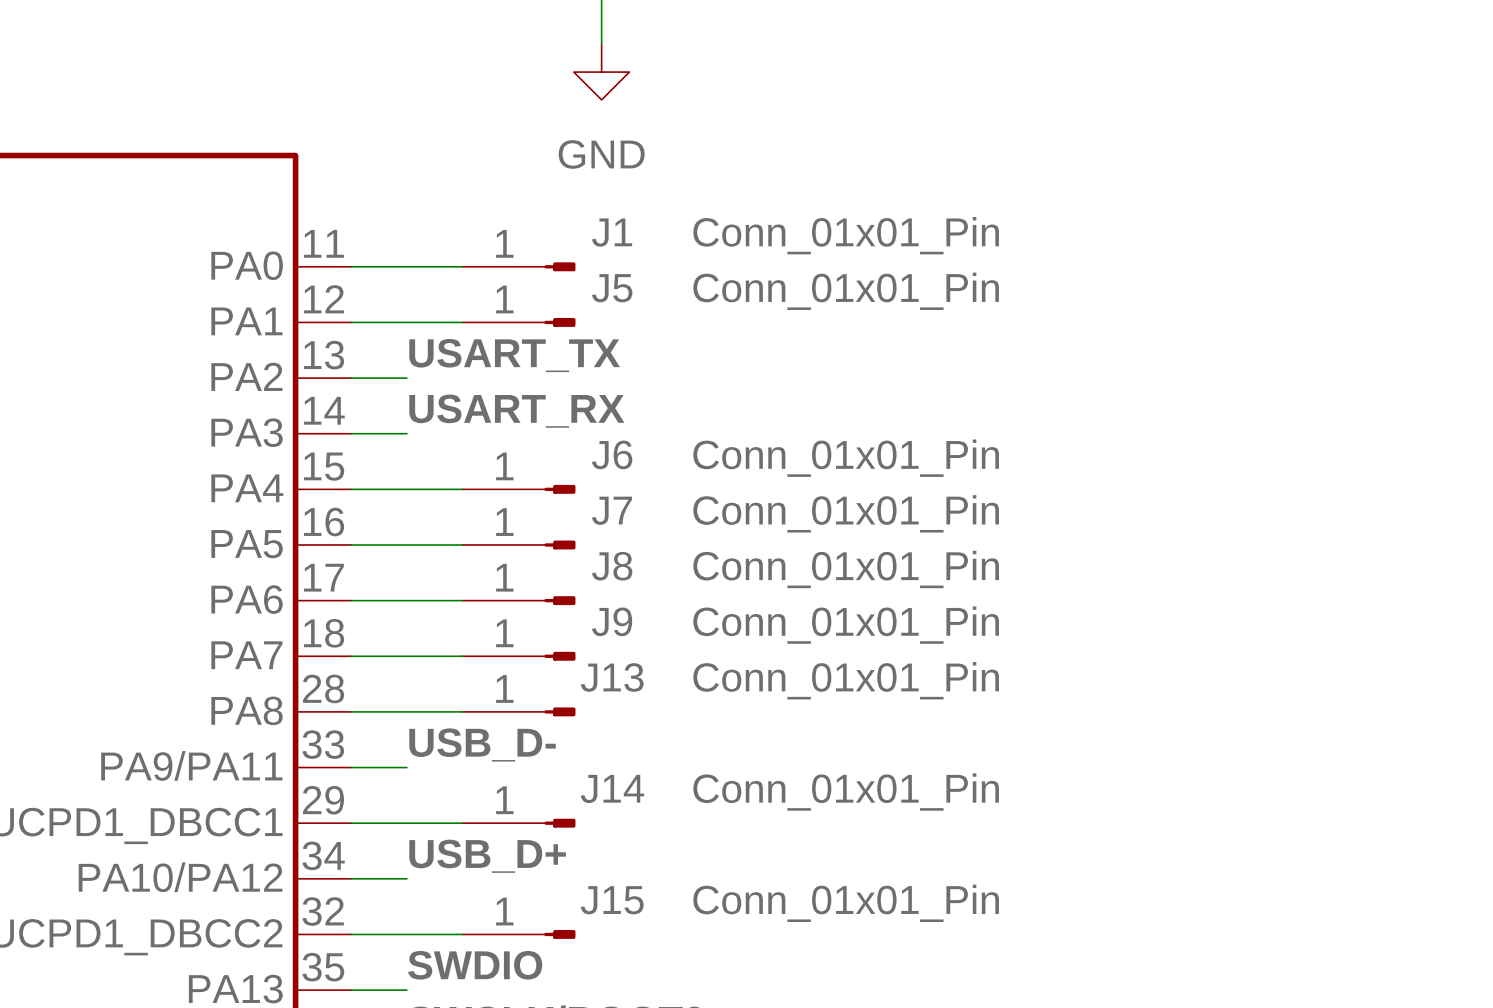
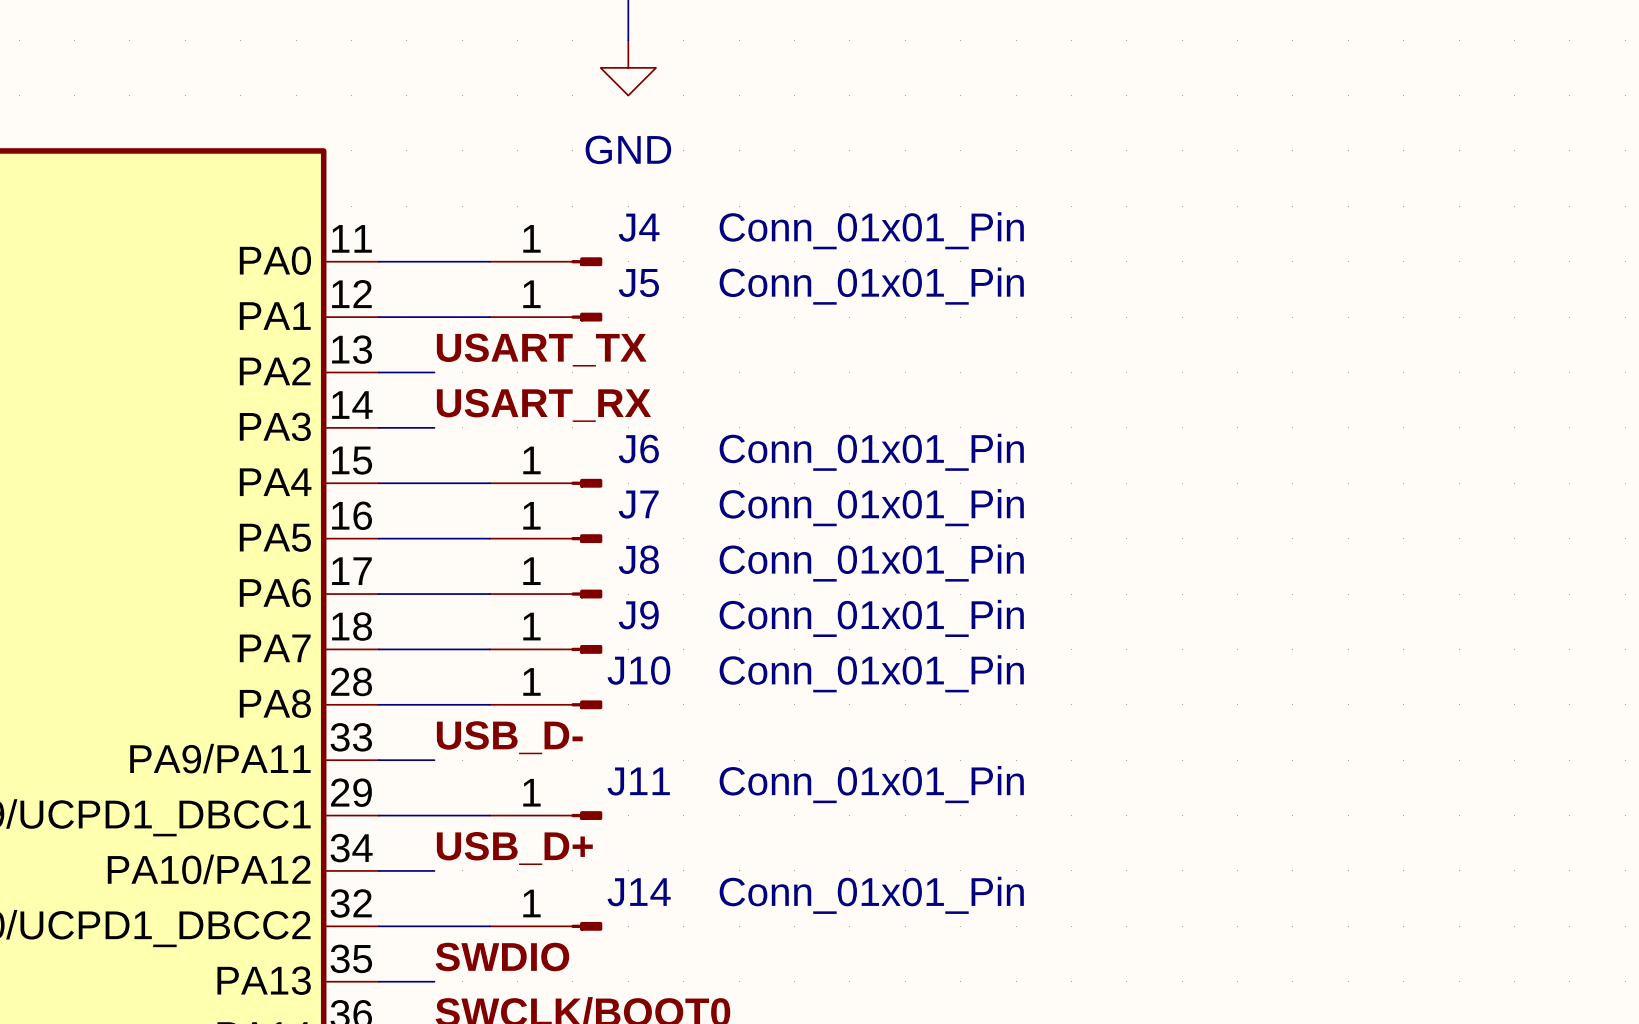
J1 name: J1 (612, 232) -> J4 (639, 227)
J13 name: J13 (612, 677) -> J10 (638, 670)
J14 name: J14 (612, 788) -> J11 (638, 781)
J15 name: J15 (612, 900) -> J14 (639, 892)

